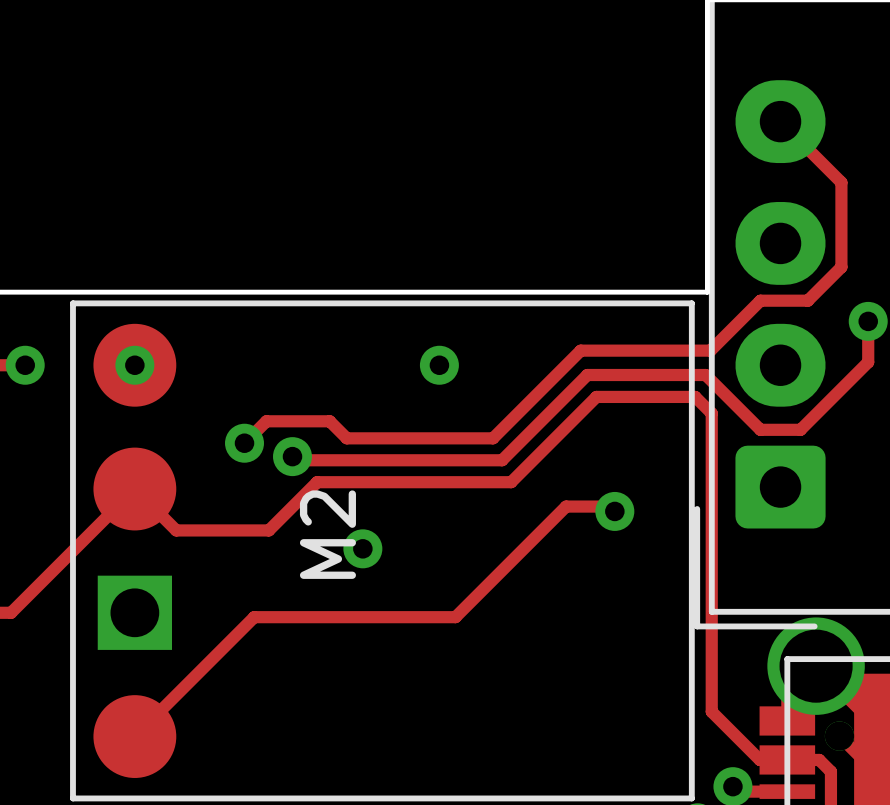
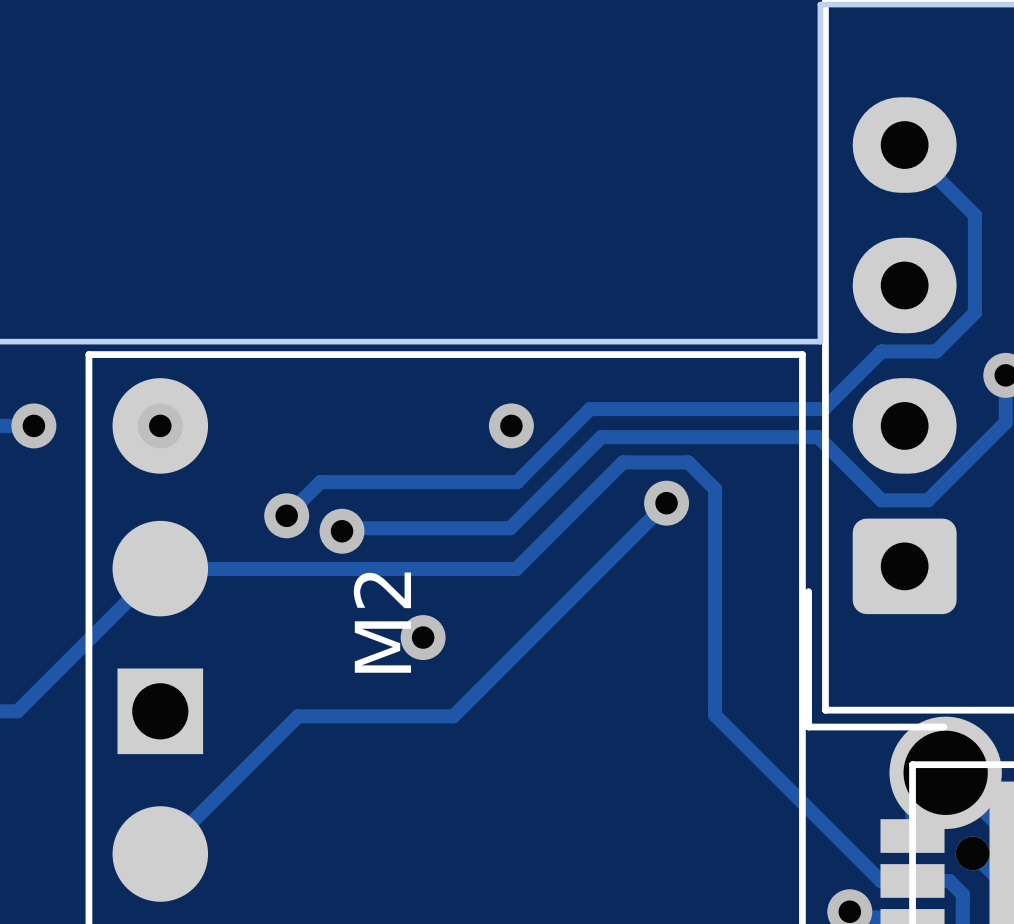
track: (580, 350) (493, 438) (346, 438) (329, 421) (266, 421) -> (674, 409) (590, 409) (517, 482) (320, 482) (311, 490)
track: (587, 375) (502, 460) (296, 460) (292, 456) -> (681, 437) (601, 437) (510, 528) (341, 528)
track: (135, 489) (176, 530) (268, 530) (317, 482) (511, 482) (596, 396) (695, 396) (711, 413) (711, 711) -> (160, 569) (516, 569) (623, 462) (688, 462) (715, 489) (715, 715) (825, 825)
track: (614, 511) (609, 506) (566, 506) (455, 617) (389, 617) -> (666, 503) (453, 716)
via position: (614, 511) -> (666, 503)

